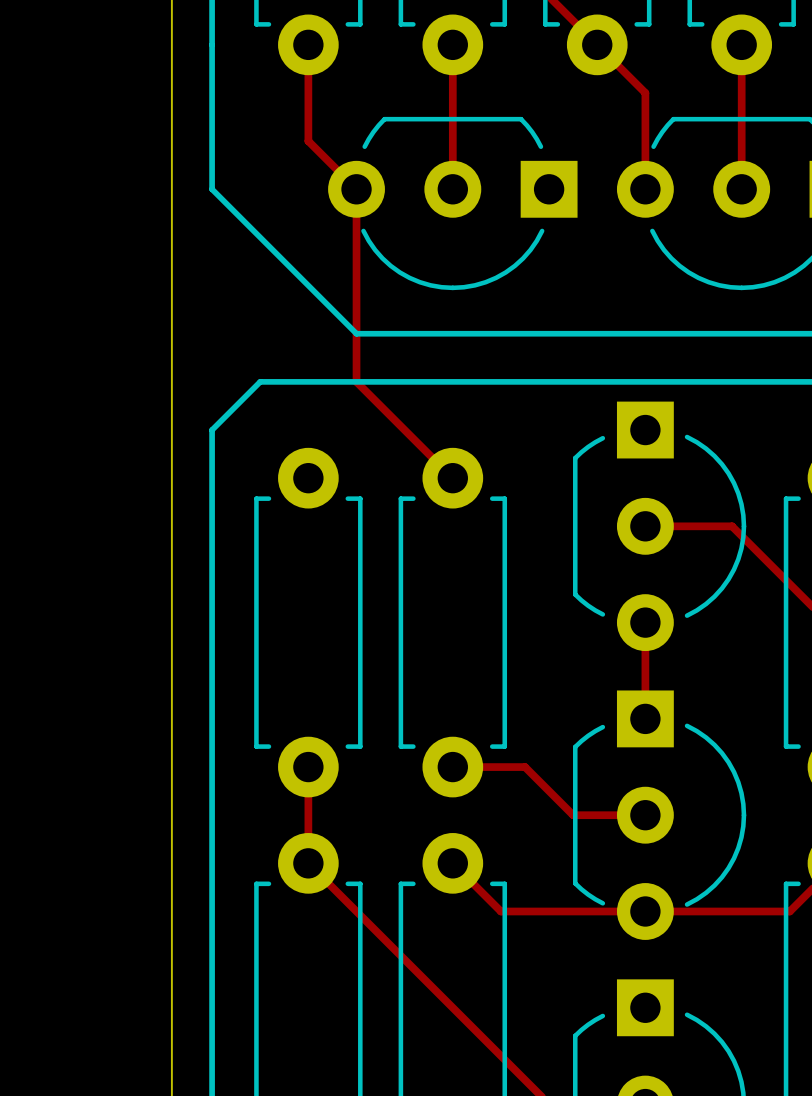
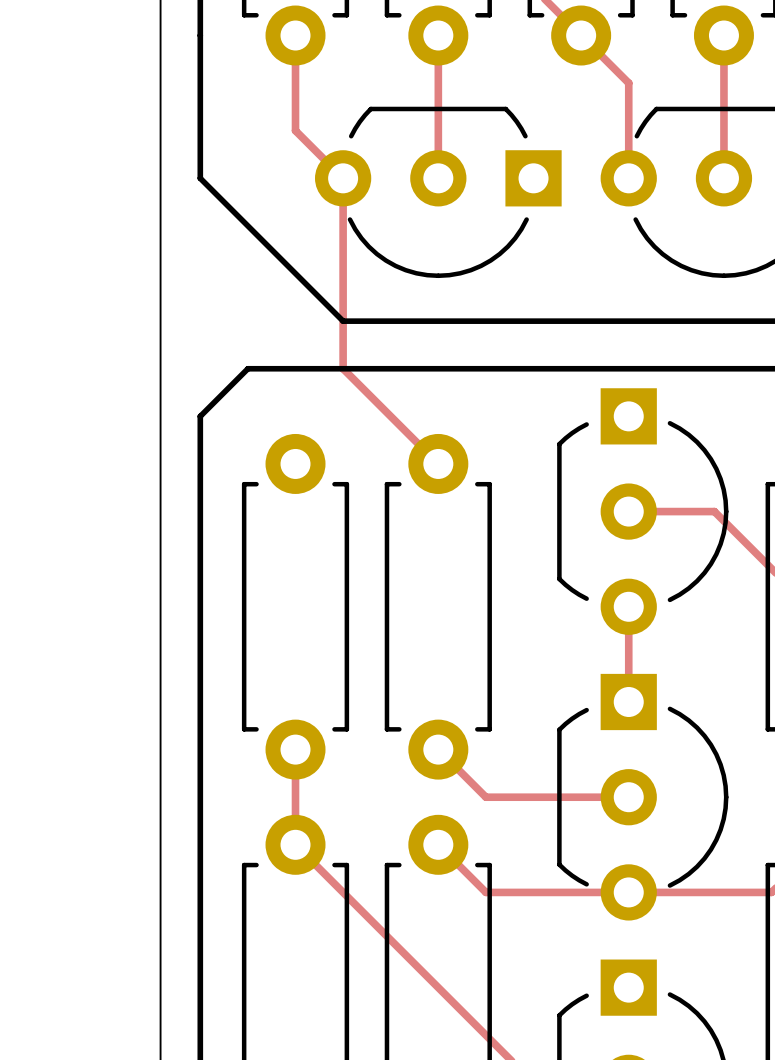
track: (452, 767) (525, 767) (573, 815) -> (438, 749) (485, 797) (557, 797)

